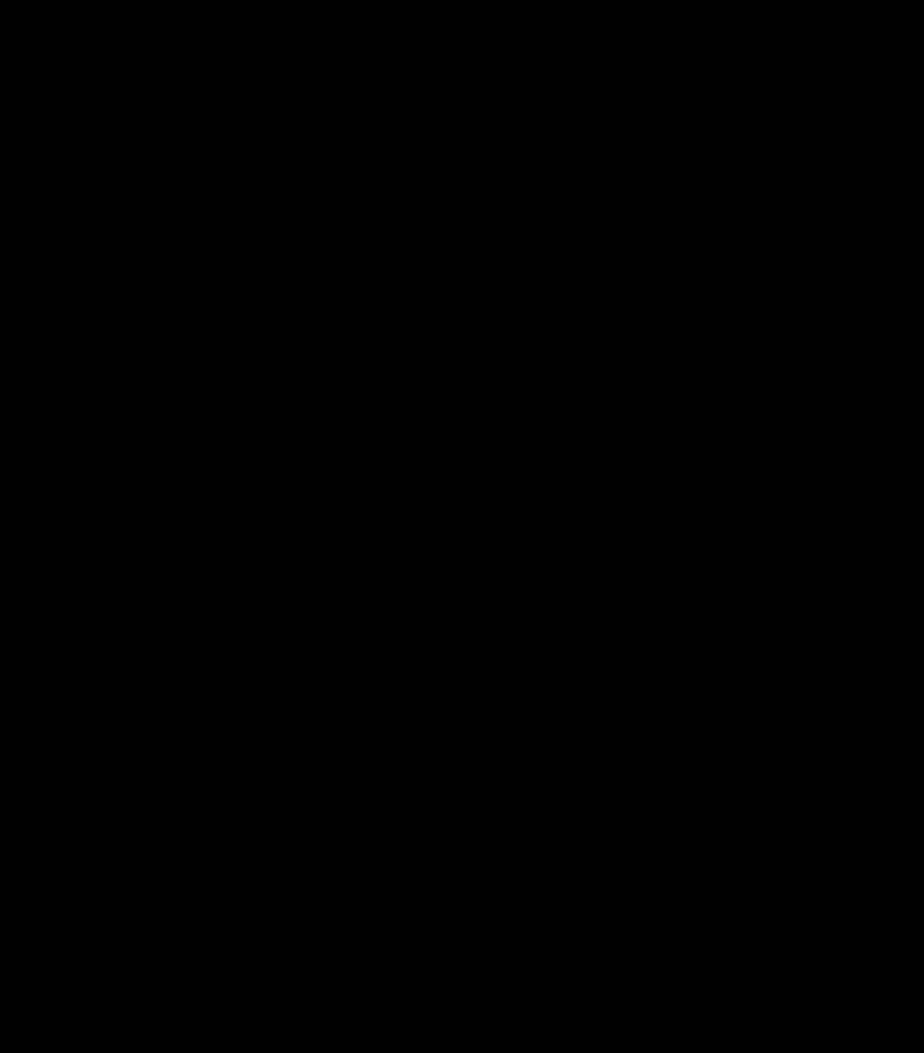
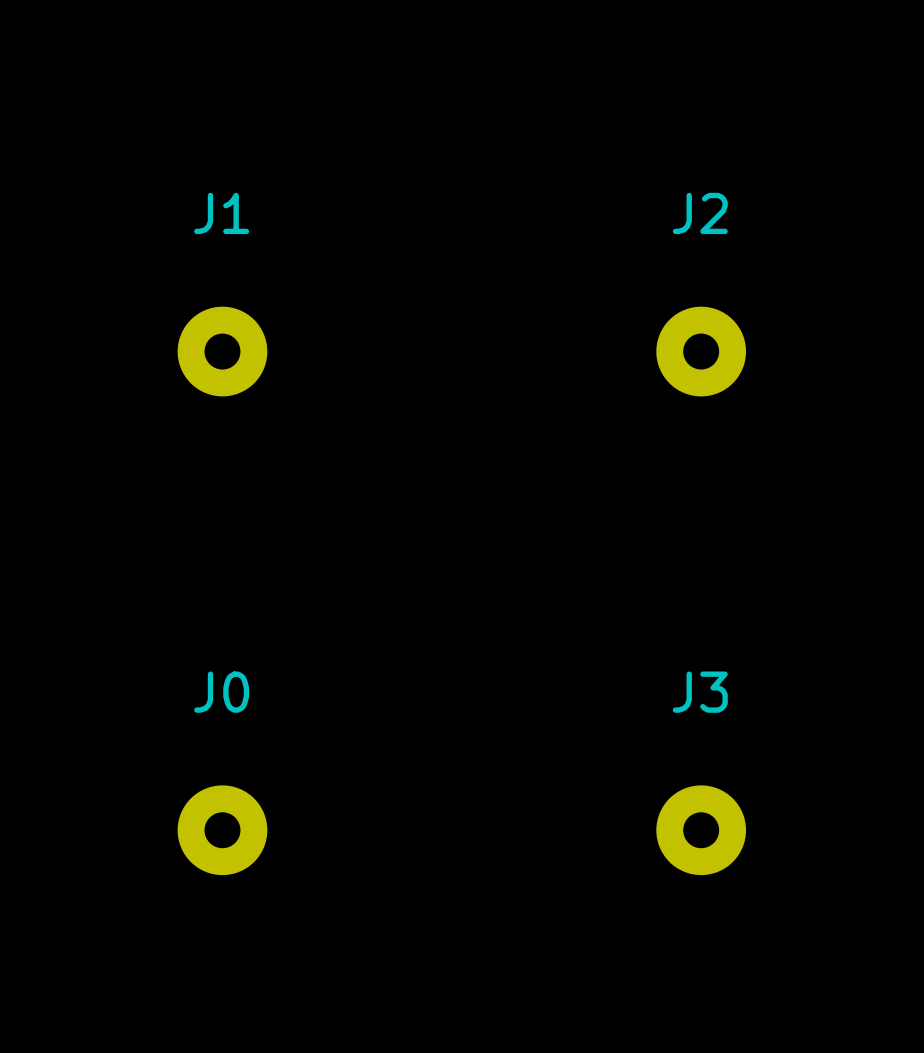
J1: none -> (222, 351)
J2: none -> (701, 351)
J0: none -> (222, 830)
J3: none -> (701, 830)

